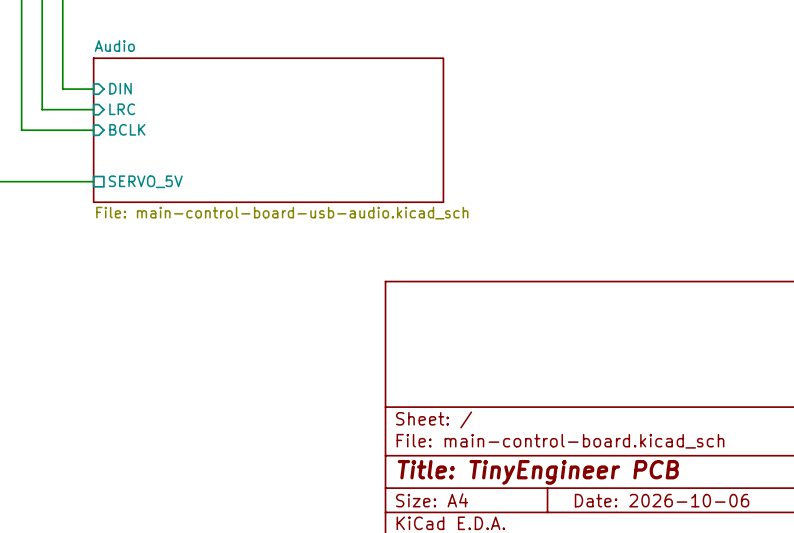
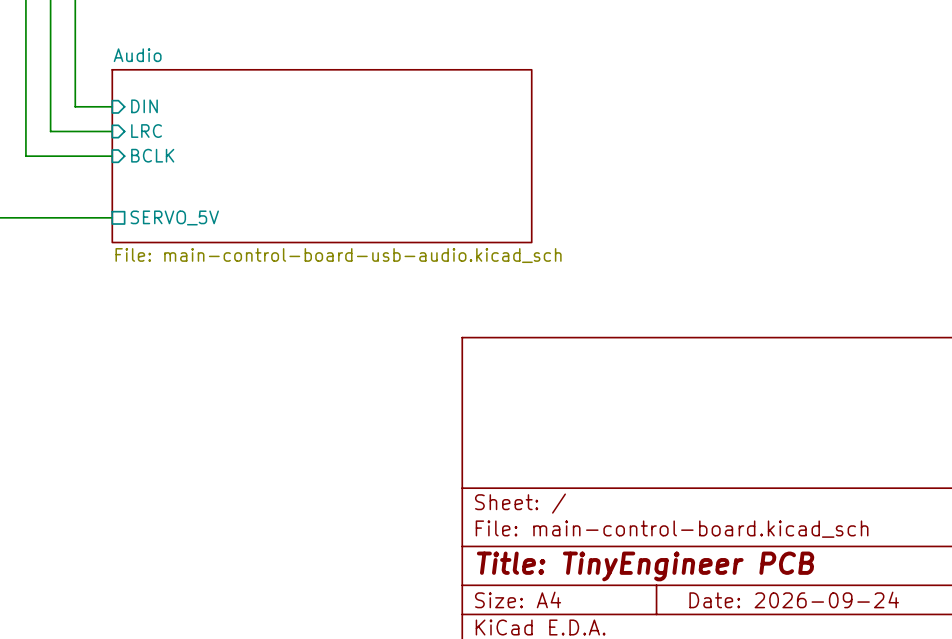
title block: Date: 2026-10-06 (662, 500) -> Date: 2026-09-24 (794, 599)

